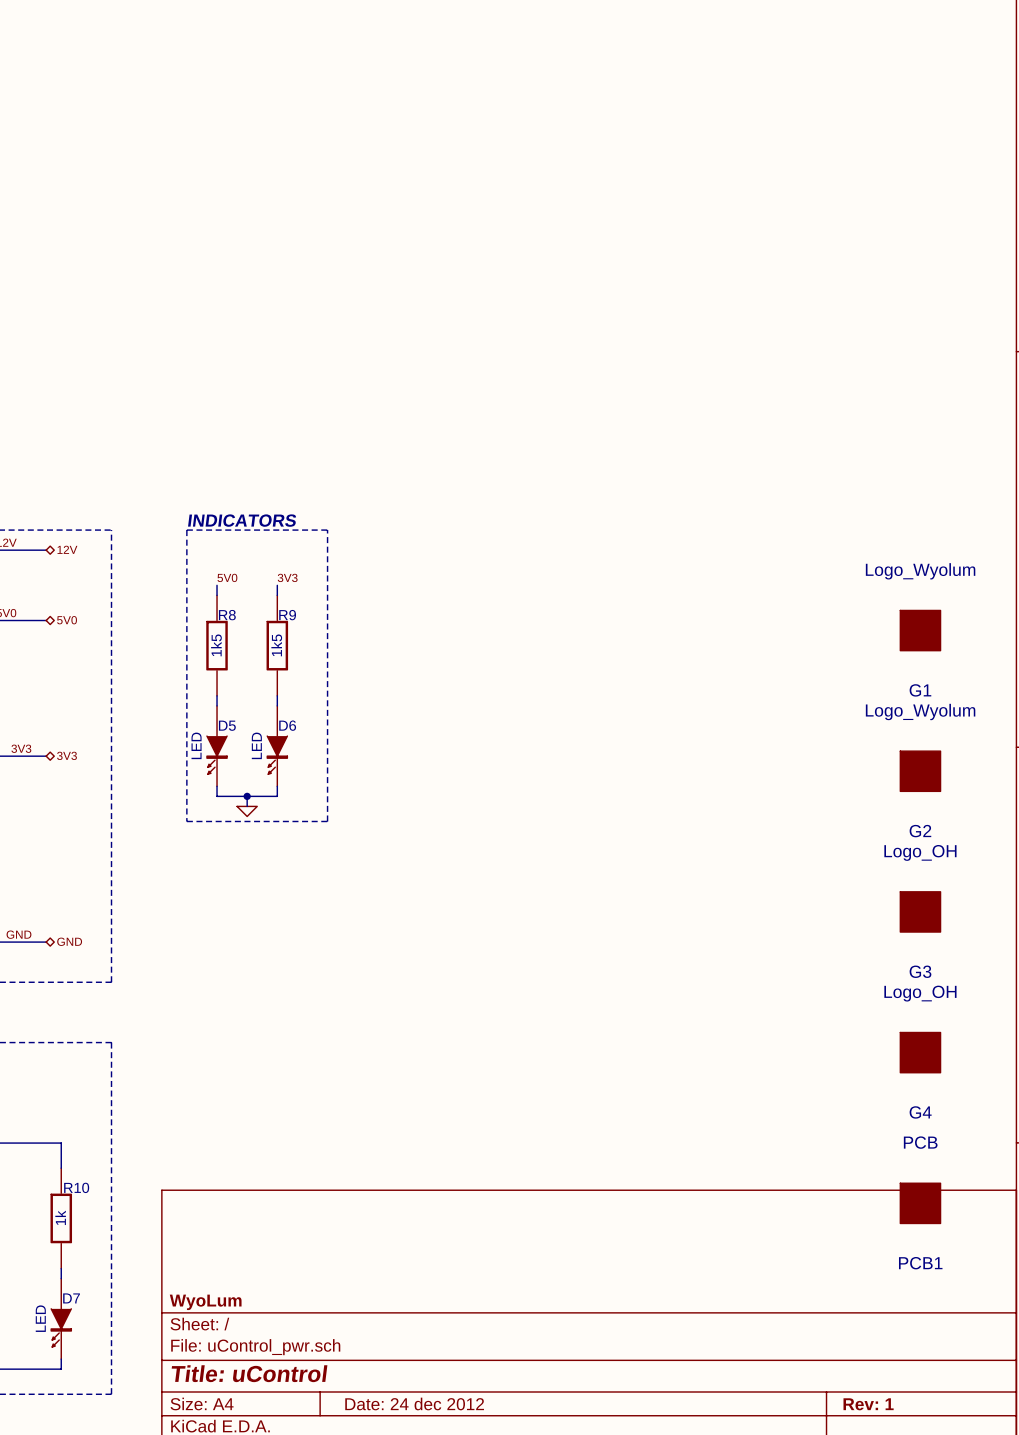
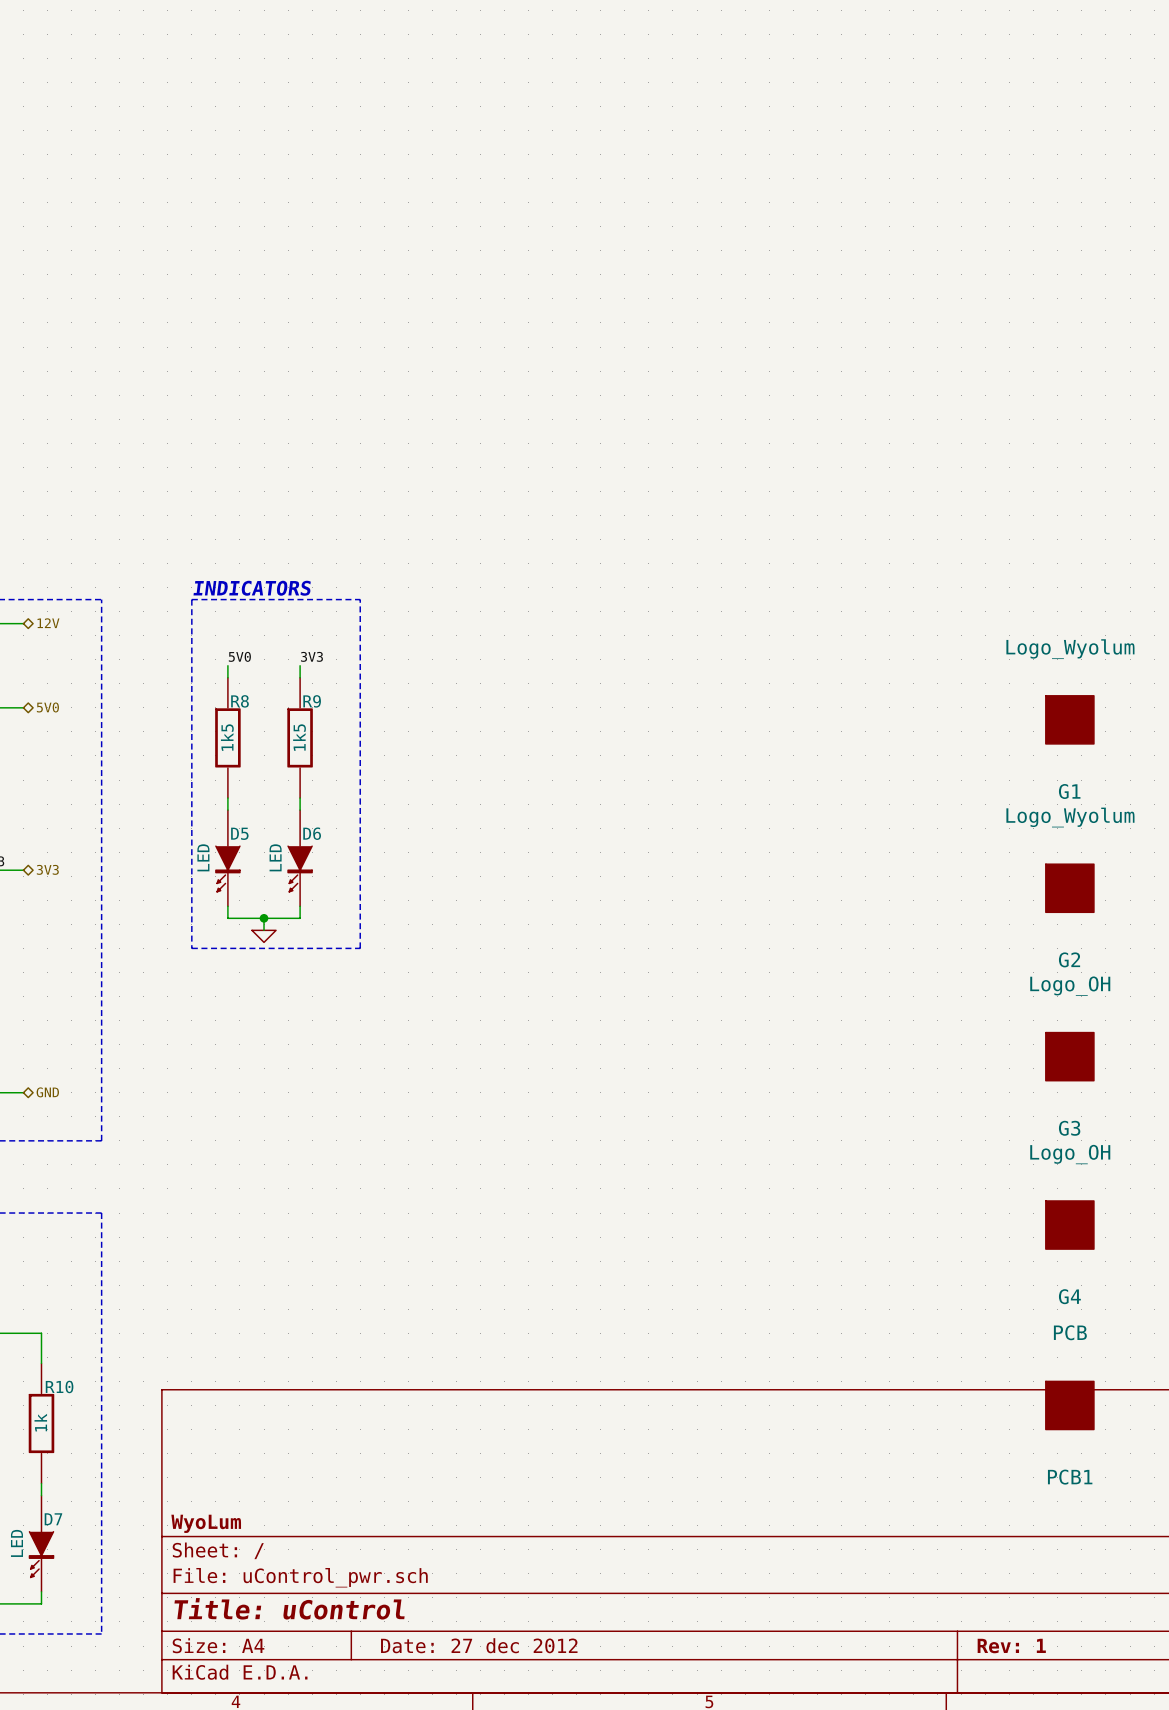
title block: Date: 24 dec 2012 (414, 1403) -> Date: 27 dec 2012 (479, 1645)

